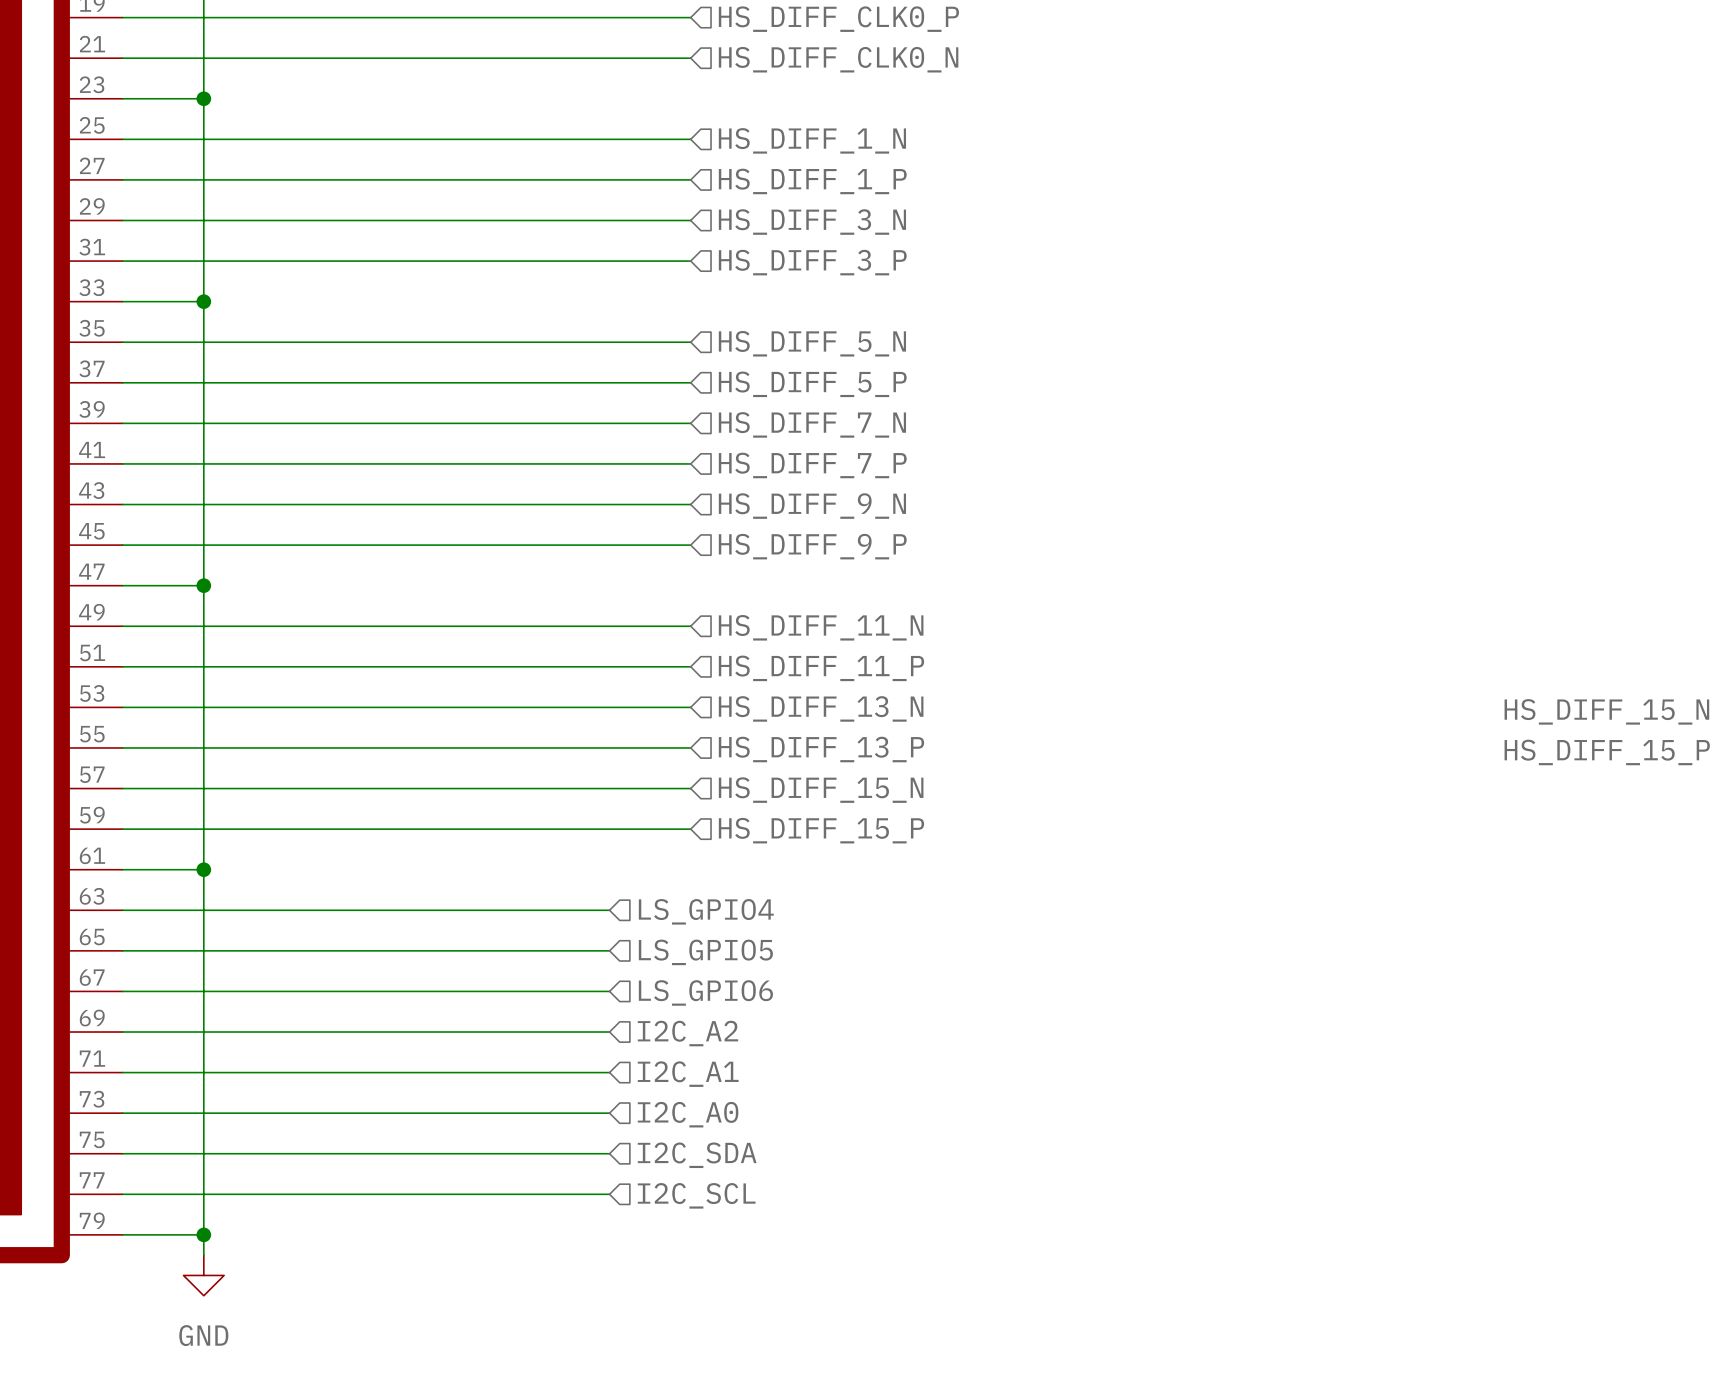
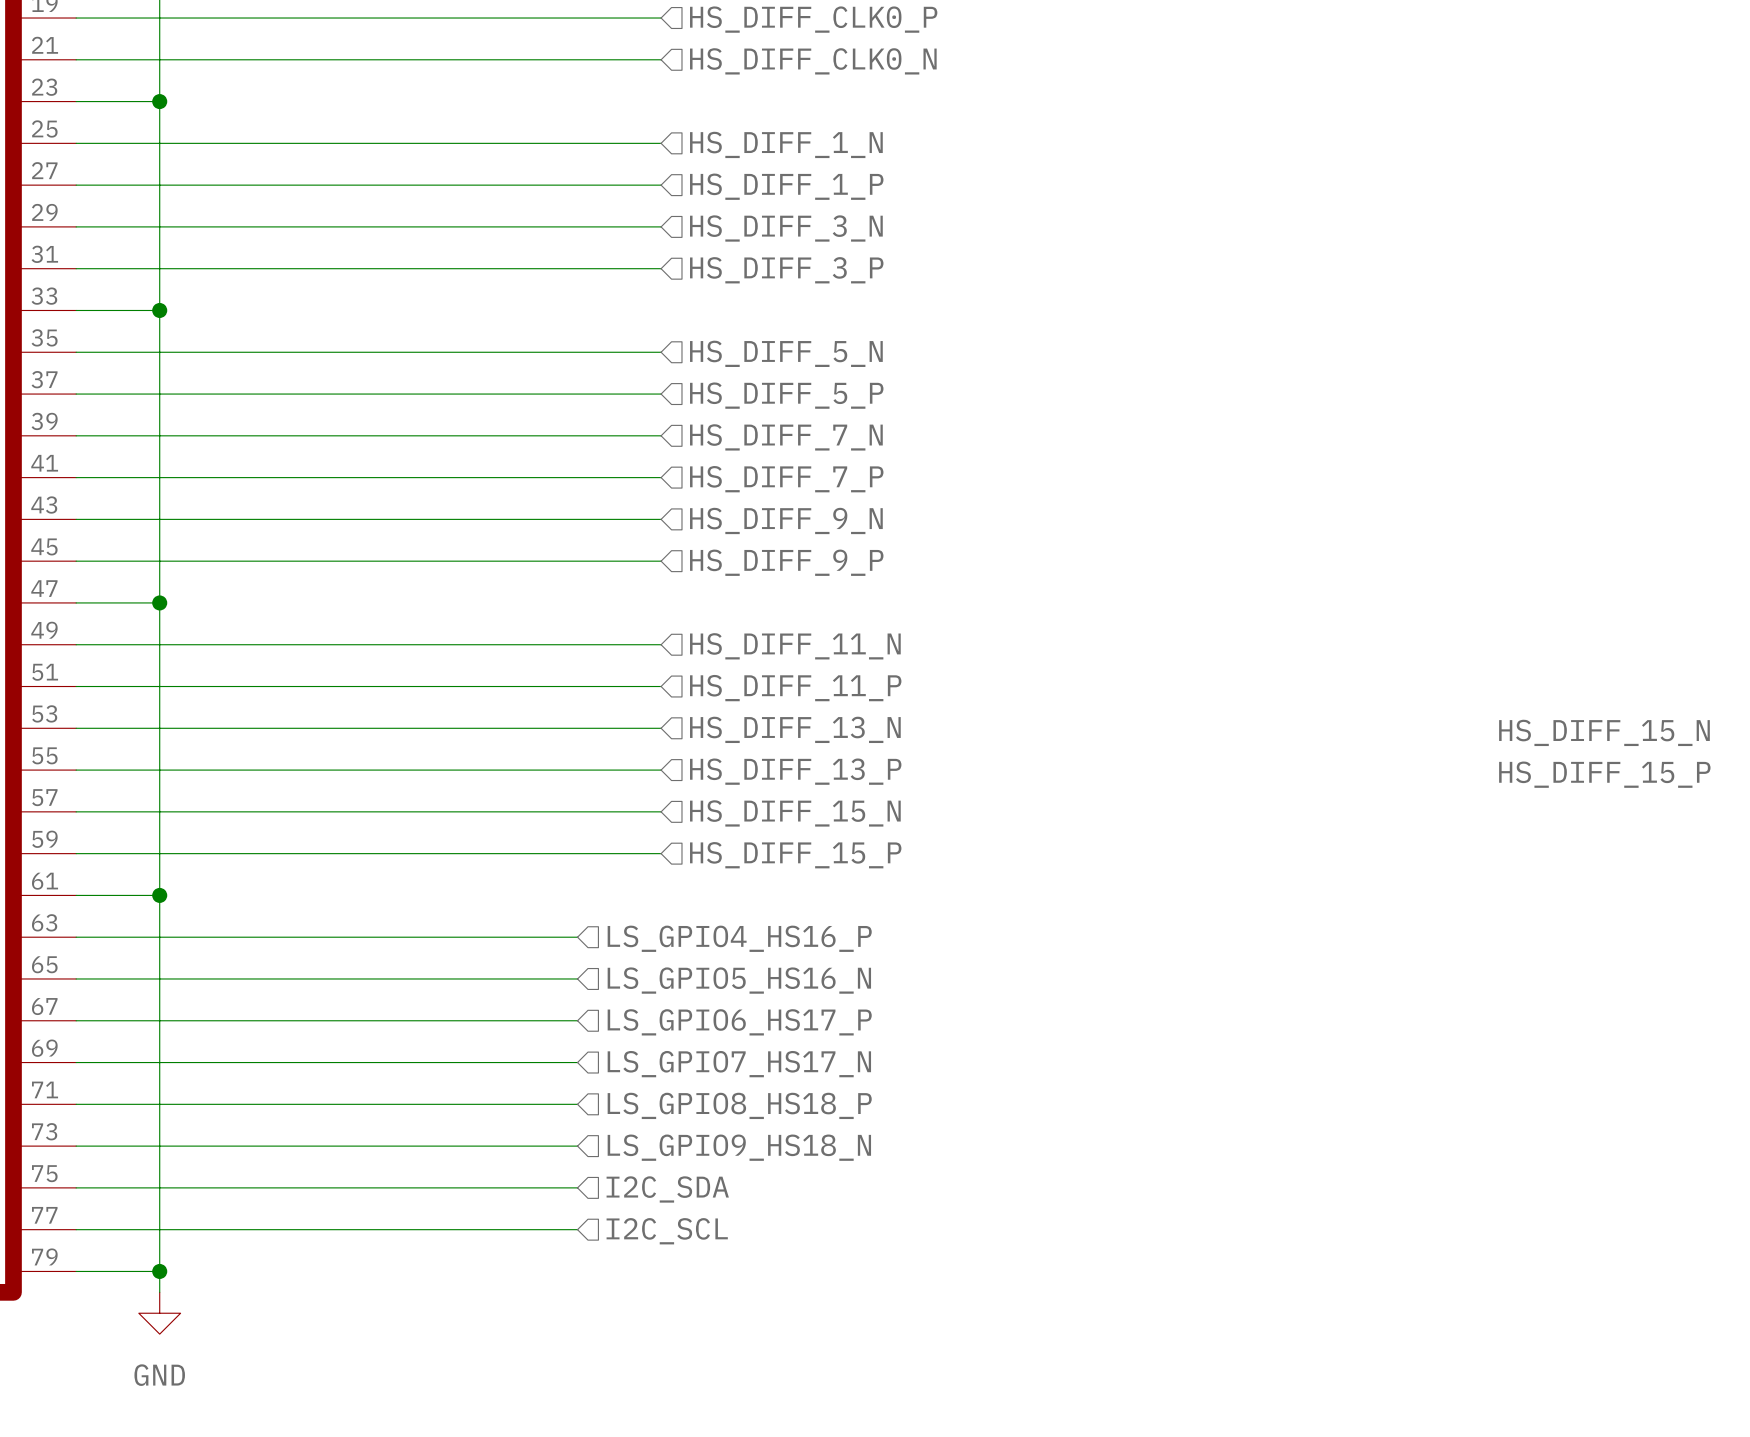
hierarchical label: LS_GPIO4 (706, 911) -> LS_GPIO4_HS16_P (739, 938)
hierarchical label: LS_GPIO5 (705, 952) -> LS_GPIO5_HS16_N (739, 980)
hierarchical label: LS_GPIO6 (705, 992) -> LS_GPIO6_HS17_P (739, 1022)
hierarchical label: I2C_A2 (687, 1033) -> LS_GPIO7_HS17_N (739, 1064)
hierarchical label: I2C_A1 (688, 1074) -> LS_GPIO8_HS18_P (739, 1105)
hierarchical label: I2C_A0 (688, 1114) -> LS_GPIO9_HS18_N (739, 1147)

